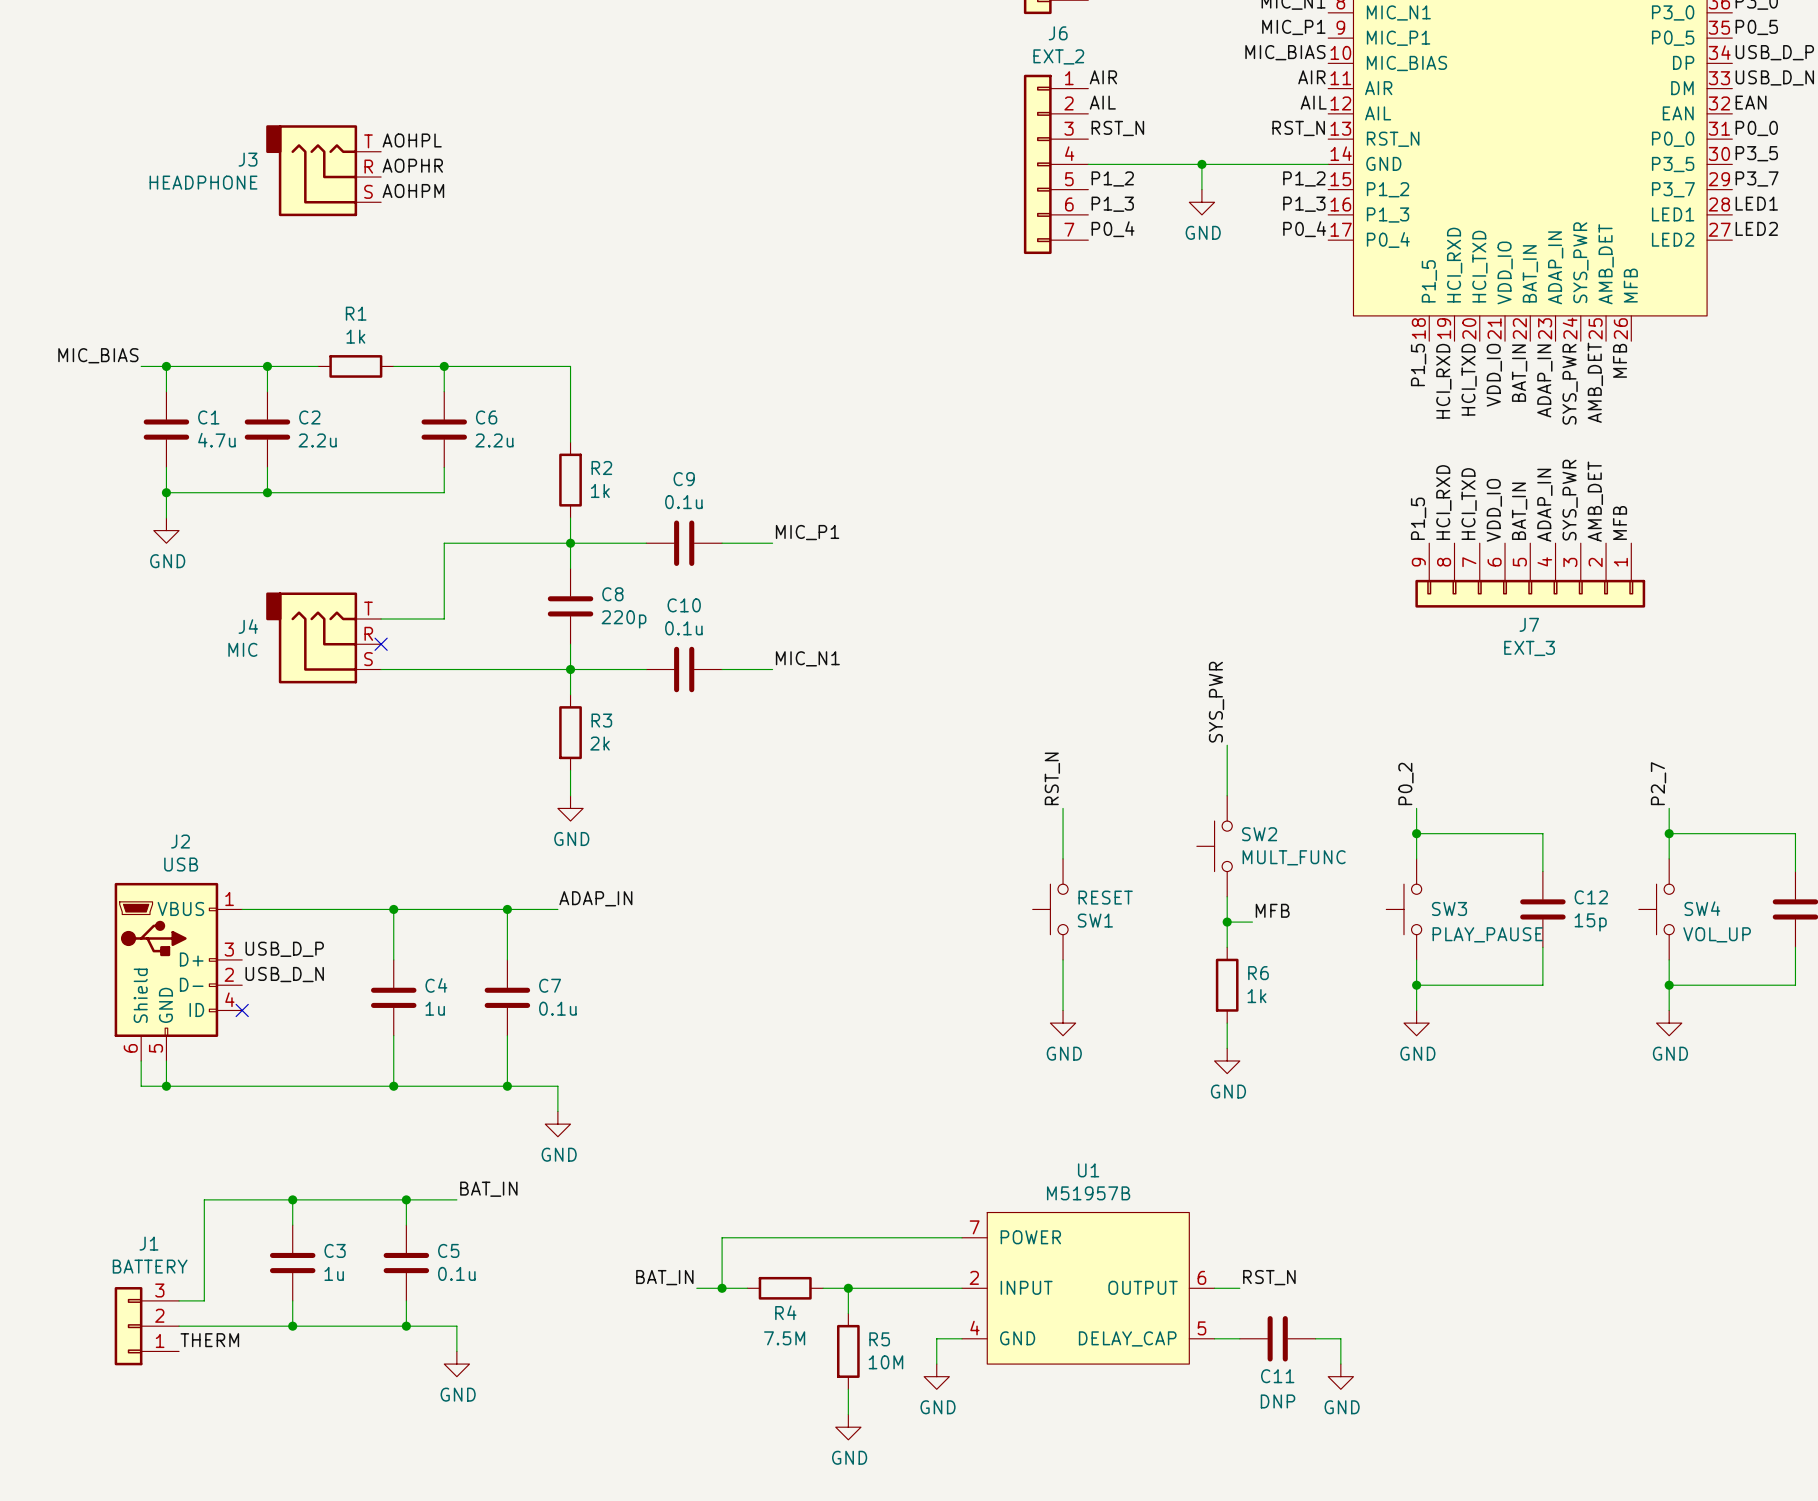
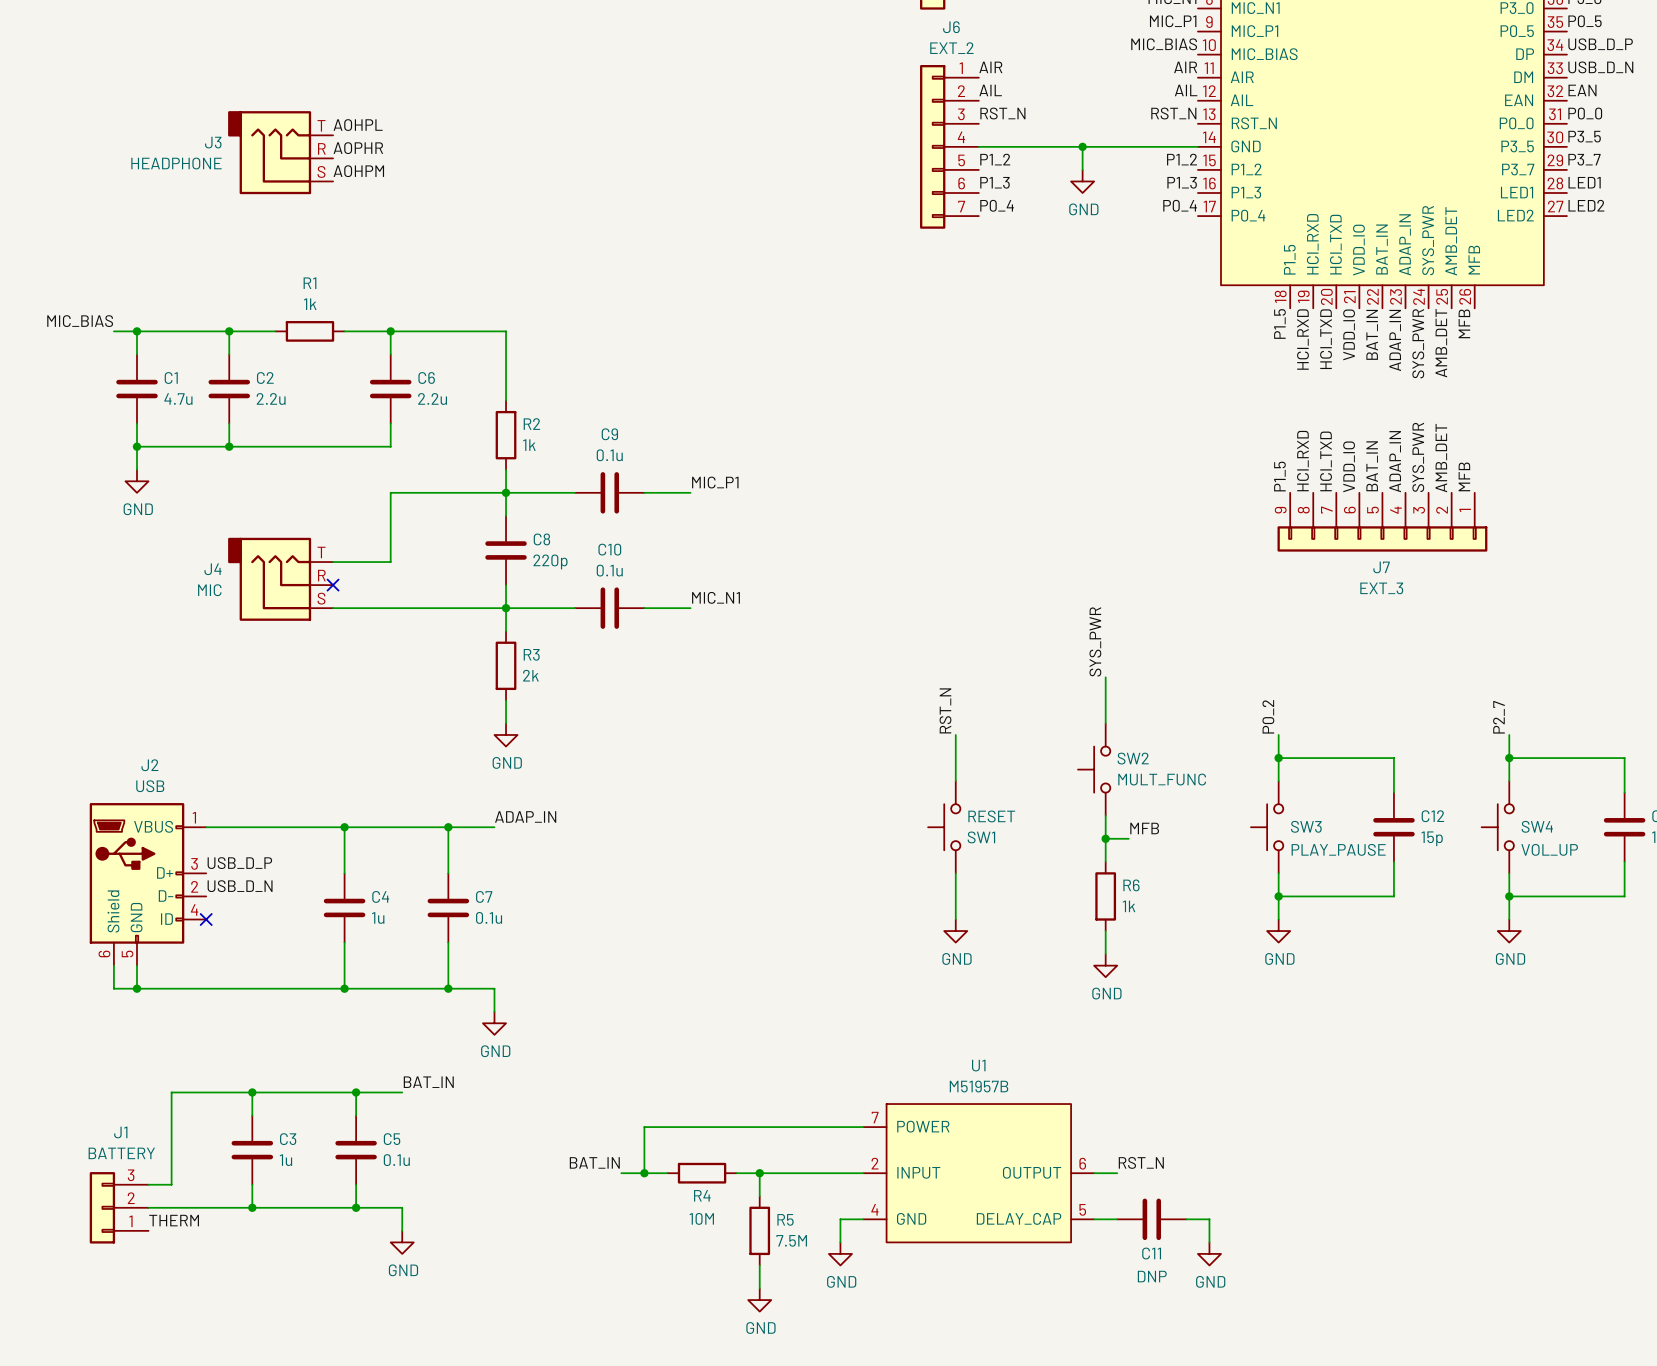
R4 value: 7.5M (784, 1338) -> 10M (701, 1218)
R5 value: 10M (885, 1362) -> 7.5M (791, 1240)

